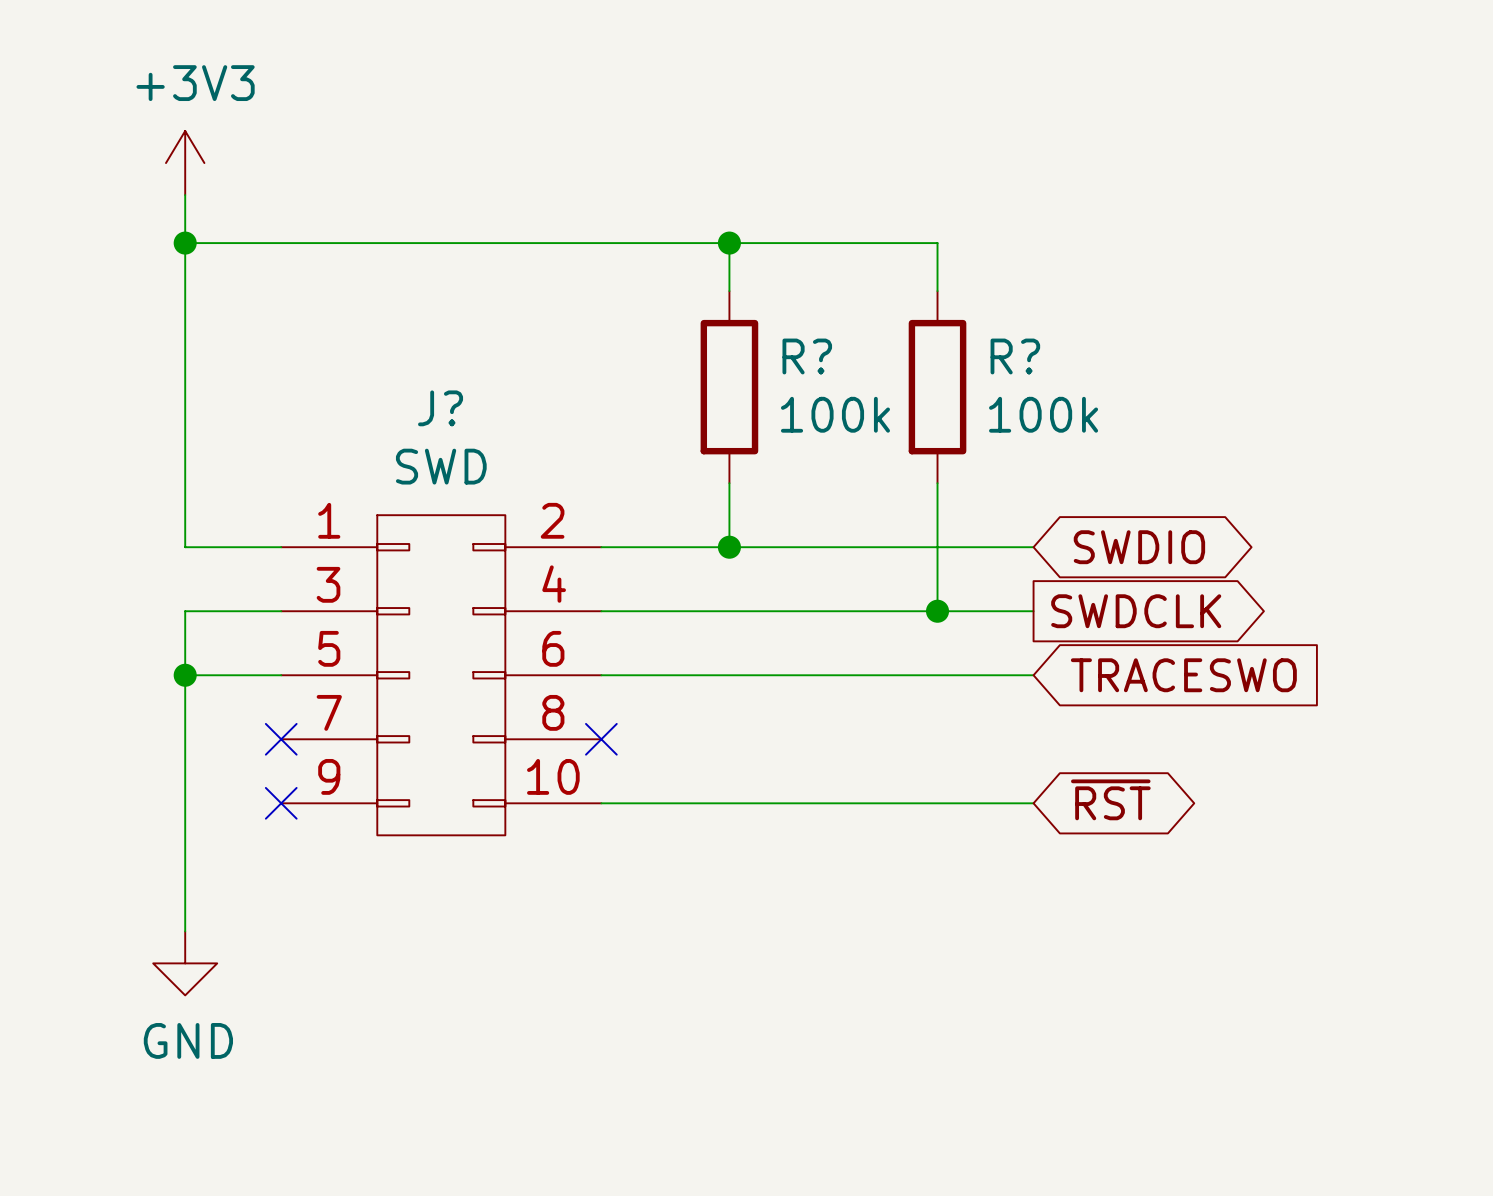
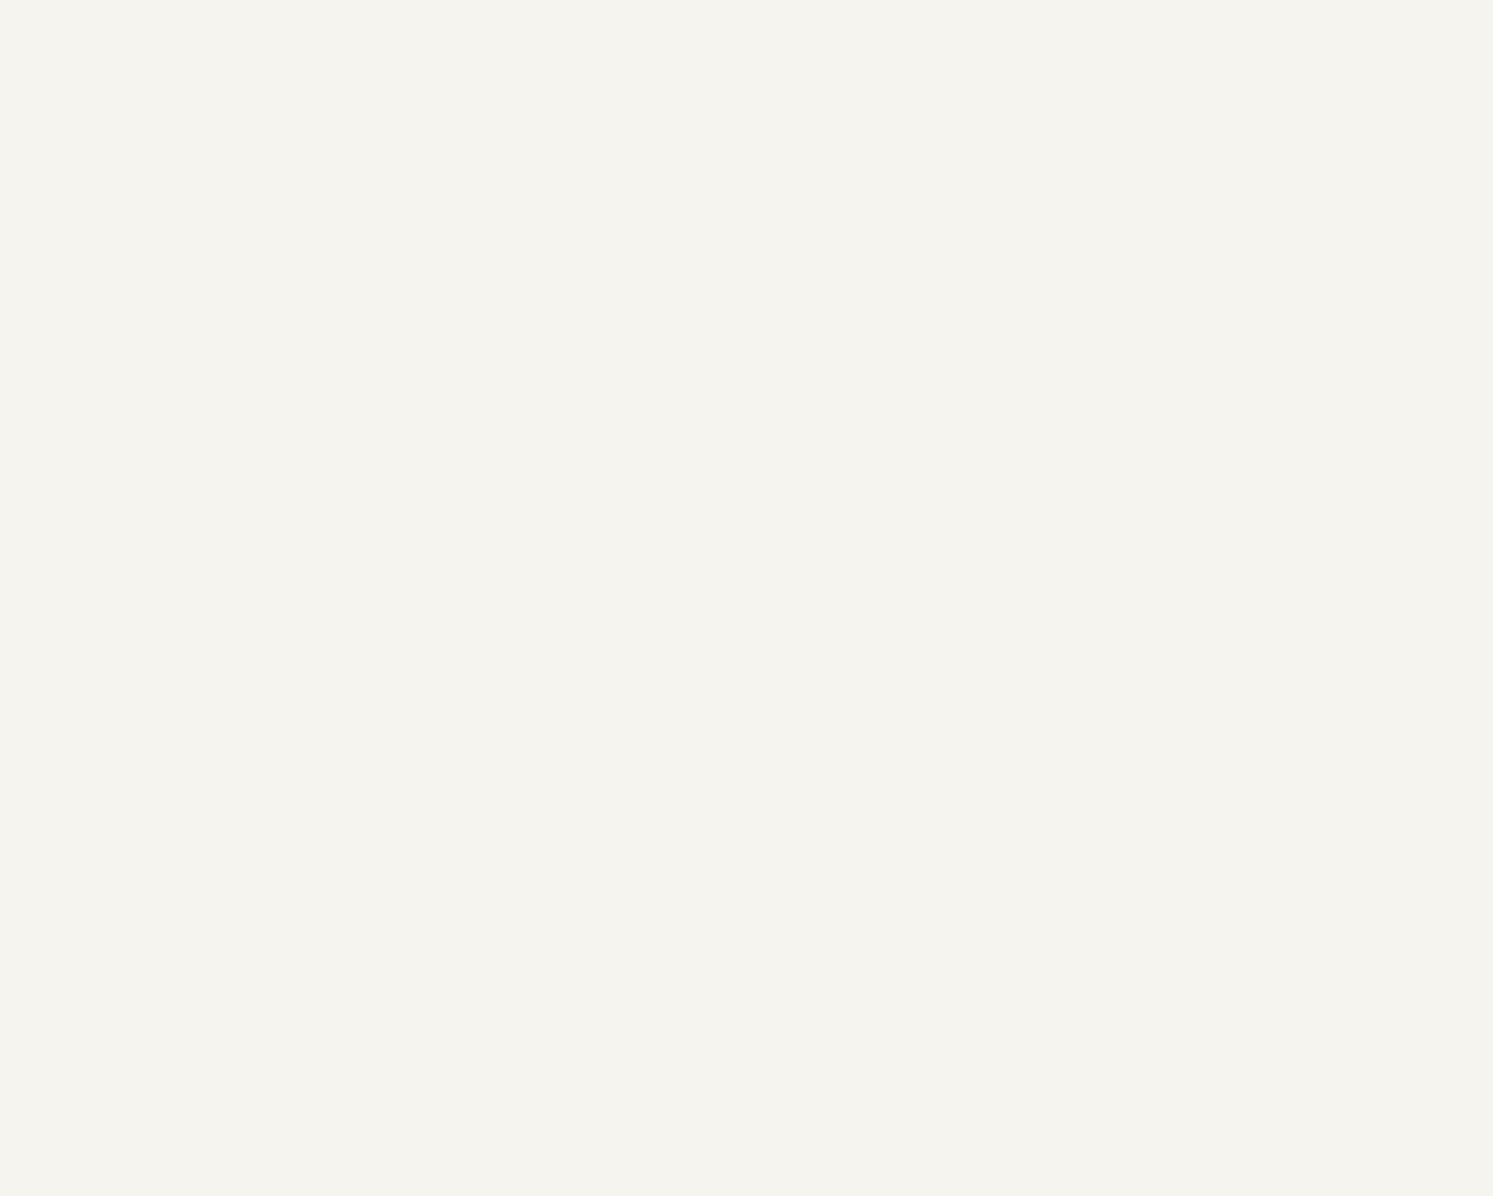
power symbol: +3V3 (185, 163) -> none
wire: (185, 195) (185, 547) (281, 547) -> none
wire: (185, 243) (937, 243) (937, 291) -> none
junction: (185, 243) -> none
wire: (729, 243) (729, 291) -> none
junction: (729, 243) -> none
R?: 100k (729, 387) -> none
R?: 100k (937, 387) -> none
wire: (729, 483) (729, 547) -> none
wire: (937, 483) (937, 611) -> none
wire: (601, 547) (1033, 547) -> none
junction: (729, 547) -> none
global label: SWDIO (1139, 547) -> none
wire: (281, 611) (185, 611) (185, 931) -> none
wire: (601, 611) (1033, 611) -> none
junction: (937, 611) -> none
global label: SWDCLK (1136, 611) -> none
wire: (185, 675) (281, 675) -> none
junction: (185, 675) -> none
J?: SWD (441, 675) -> none
wire: (601, 675) (1033, 675) -> none
global label: TRACESWO (1183, 675) -> none
no-connect mark: (281, 739) -> none
no-connect mark: (601, 739) -> none
global label: ~{RST} (1110, 799) -> none
no-connect mark: (281, 803) -> none
wire: (601, 803) (1033, 803) -> none
power symbol: GND (185, 963) -> none

